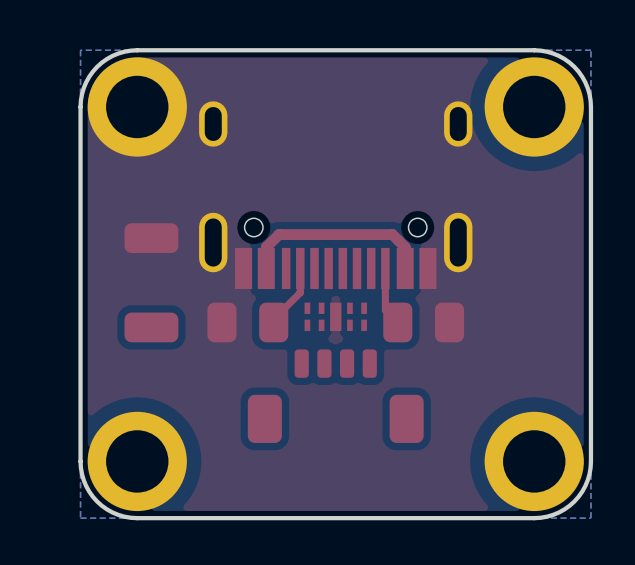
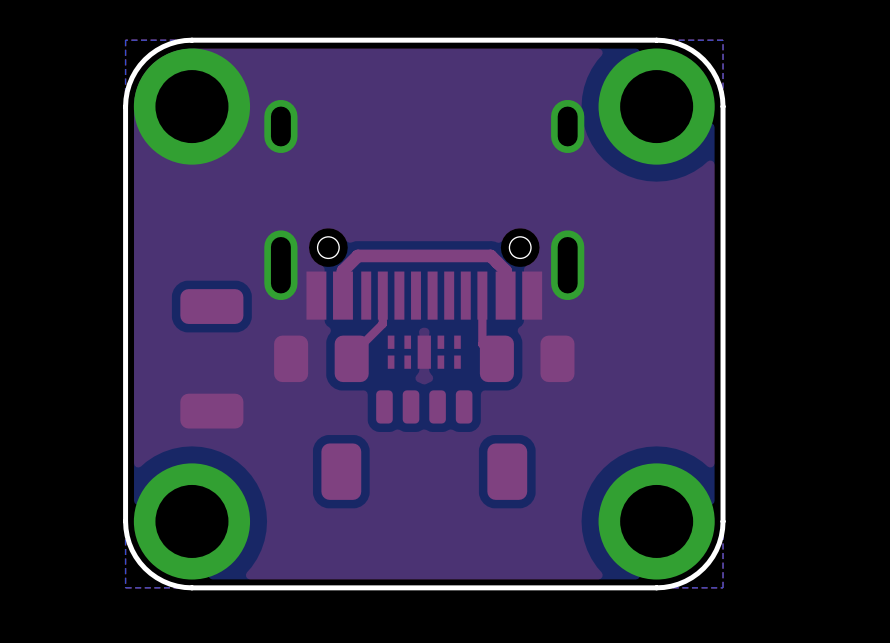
part position: (151, 282) -> (211, 358)

